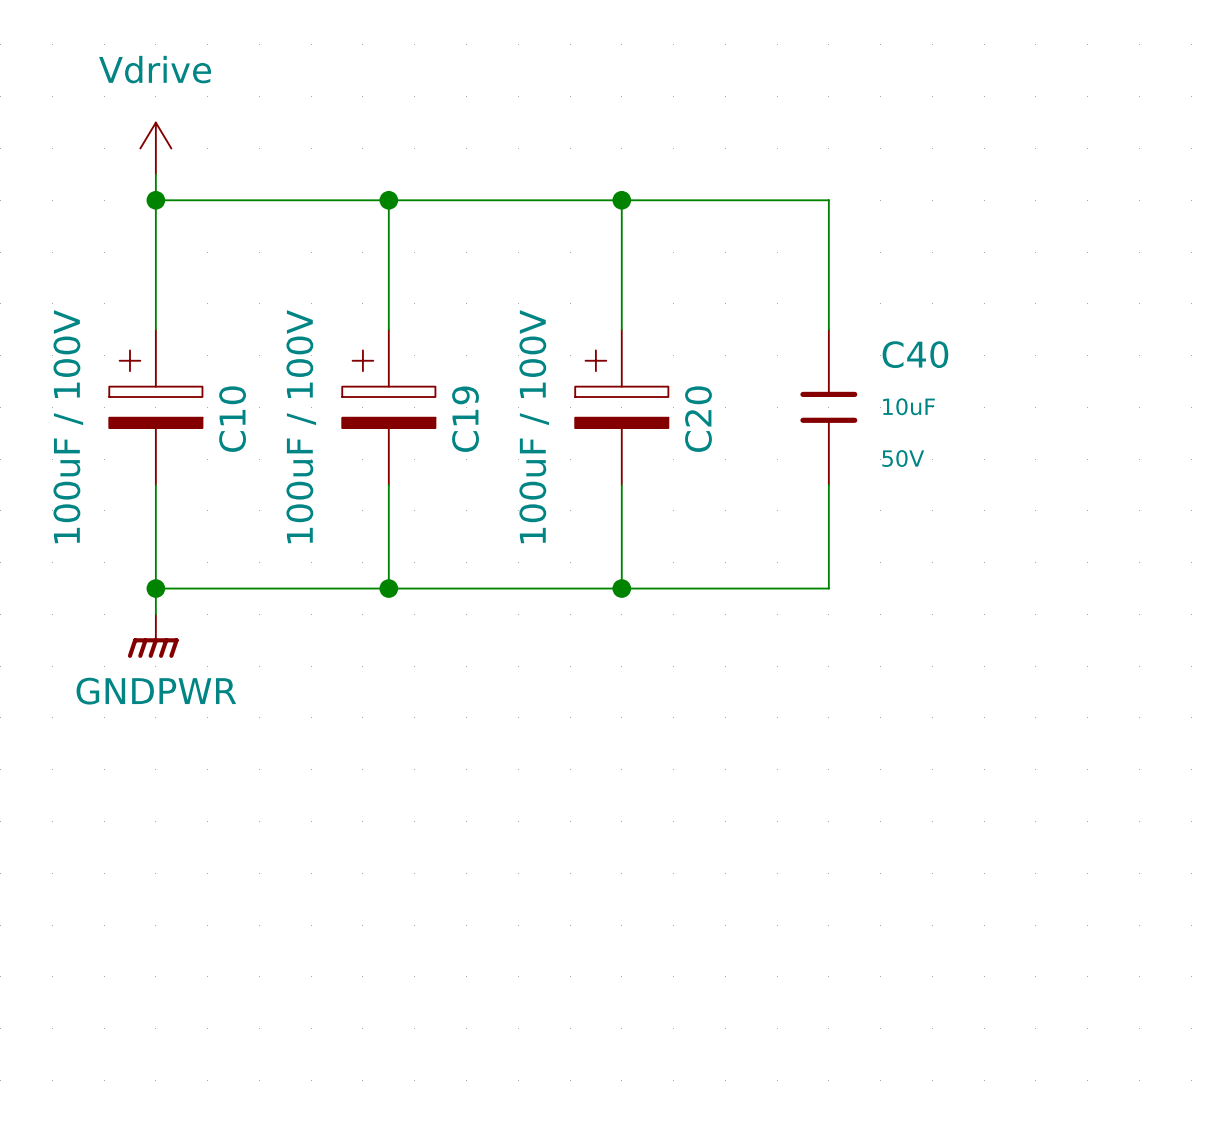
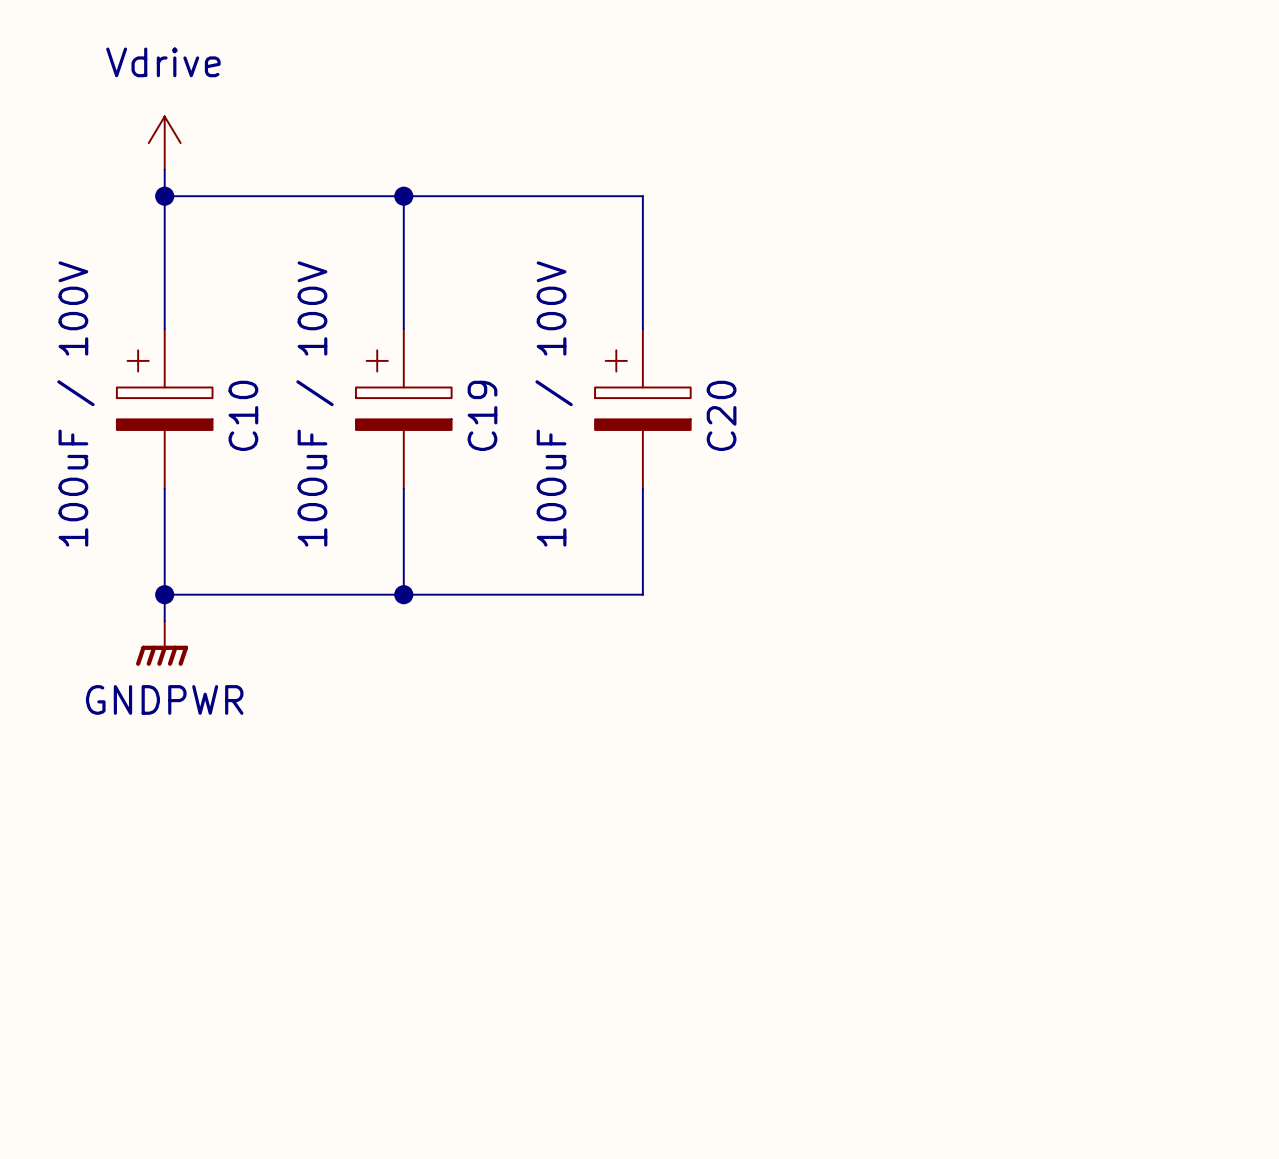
wire: (621, 200) (828, 200) (828, 329) -> none
junction: (621, 200) -> none
C40: 10uF (828, 407) -> none
wire: (828, 485) (828, 588) (621, 588) -> none
junction: (621, 588) -> none

